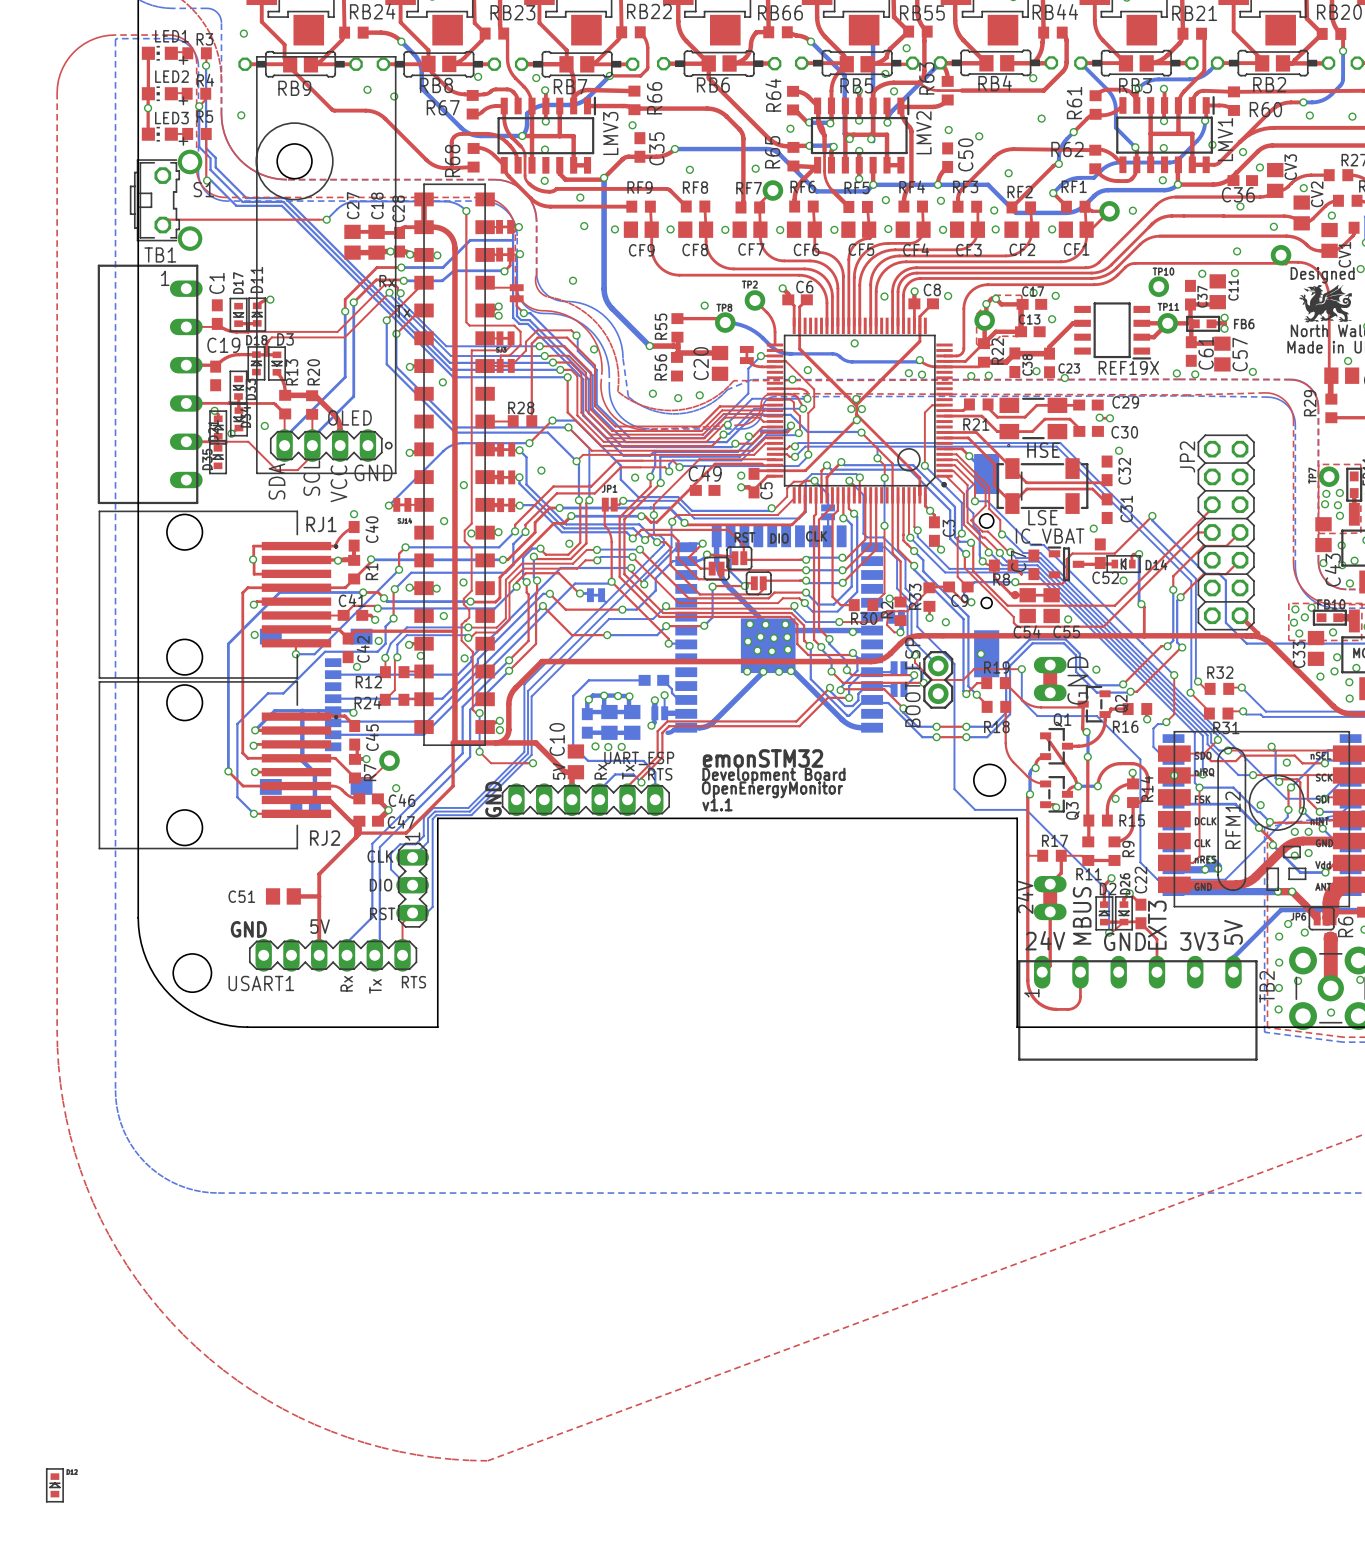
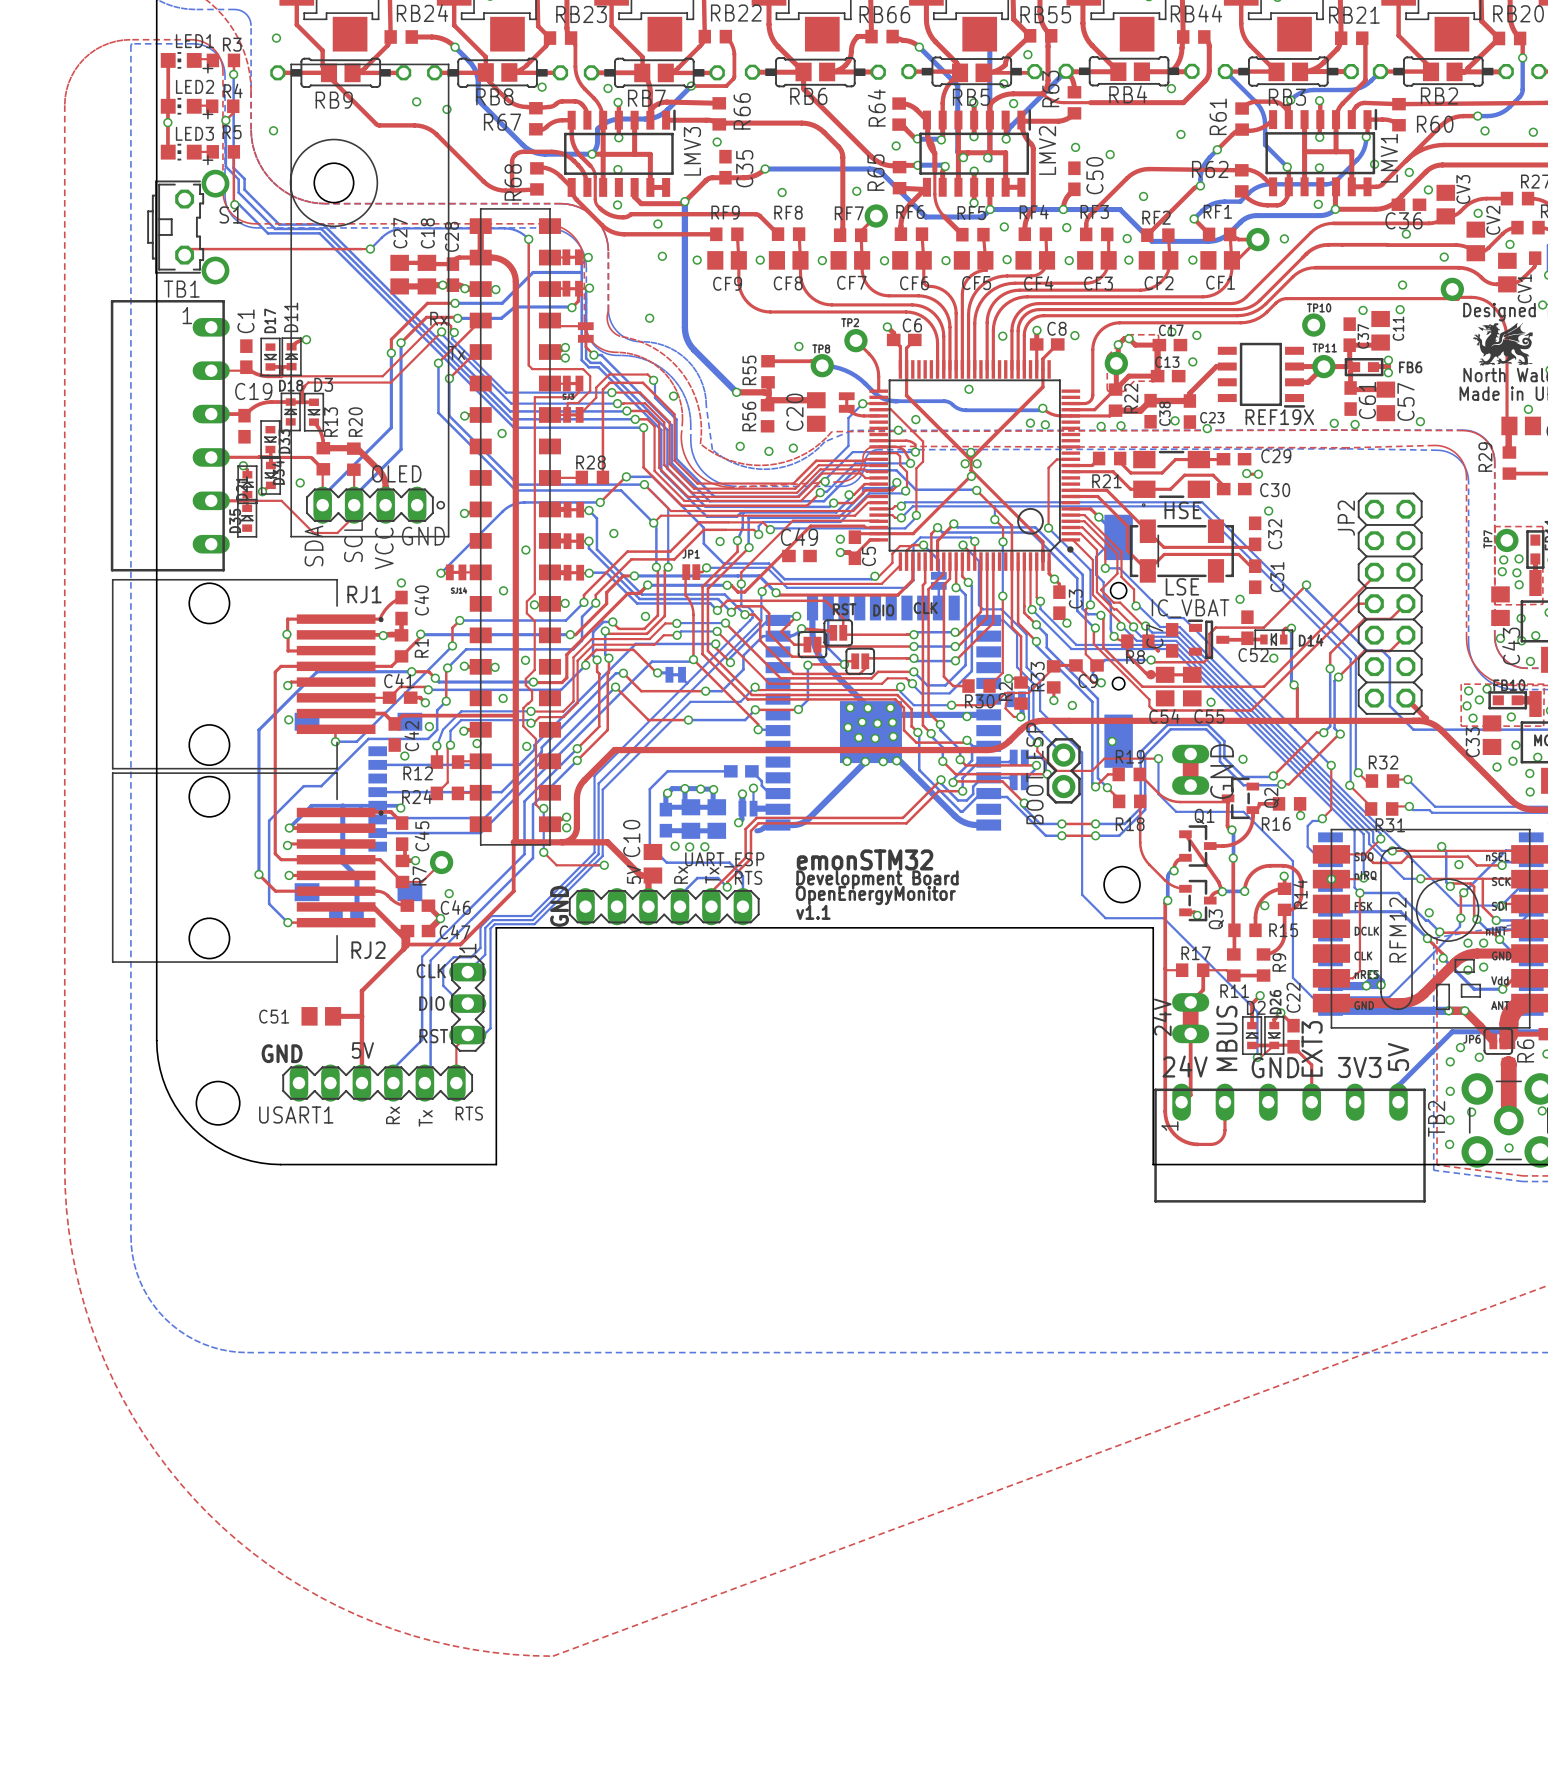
part: (54, 1485) -> none

